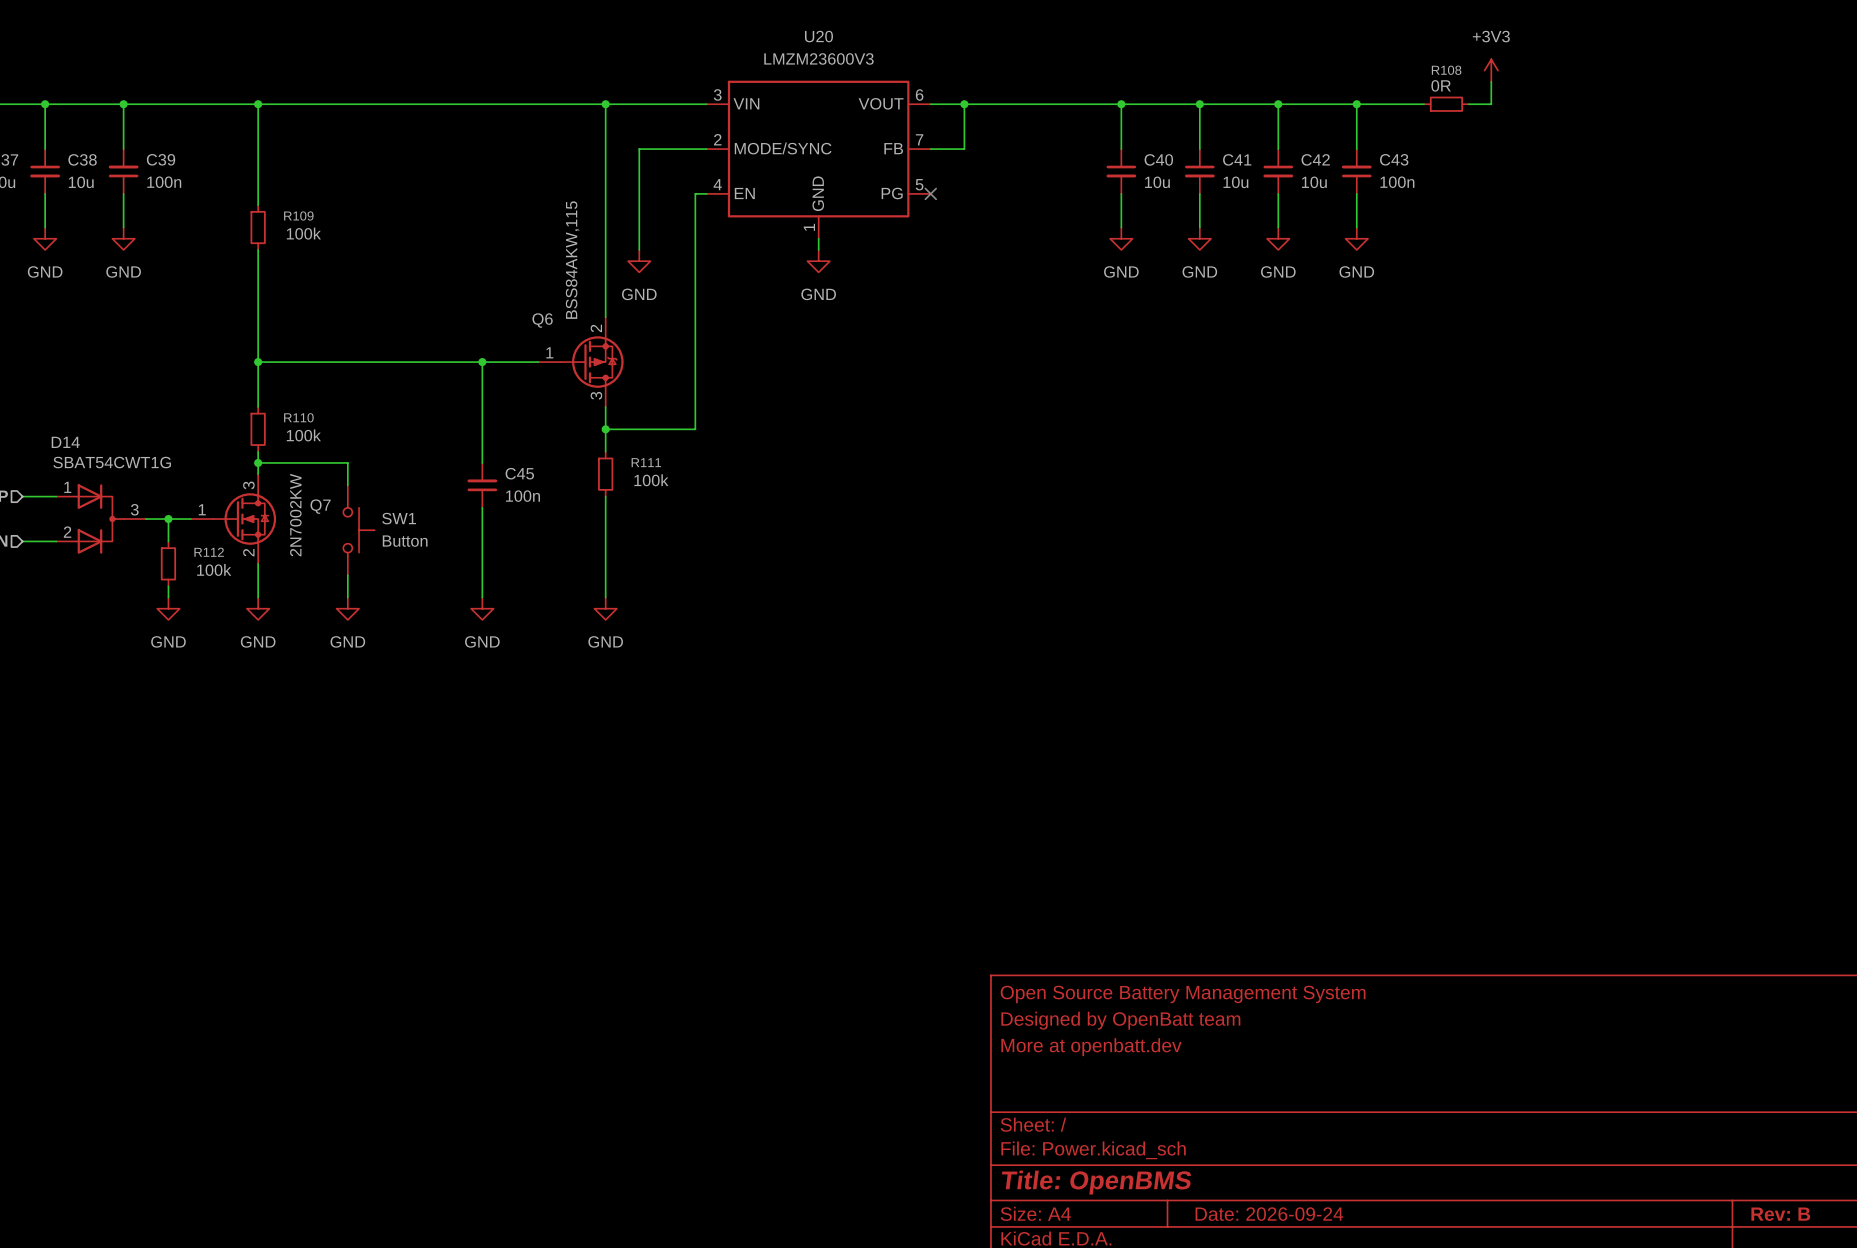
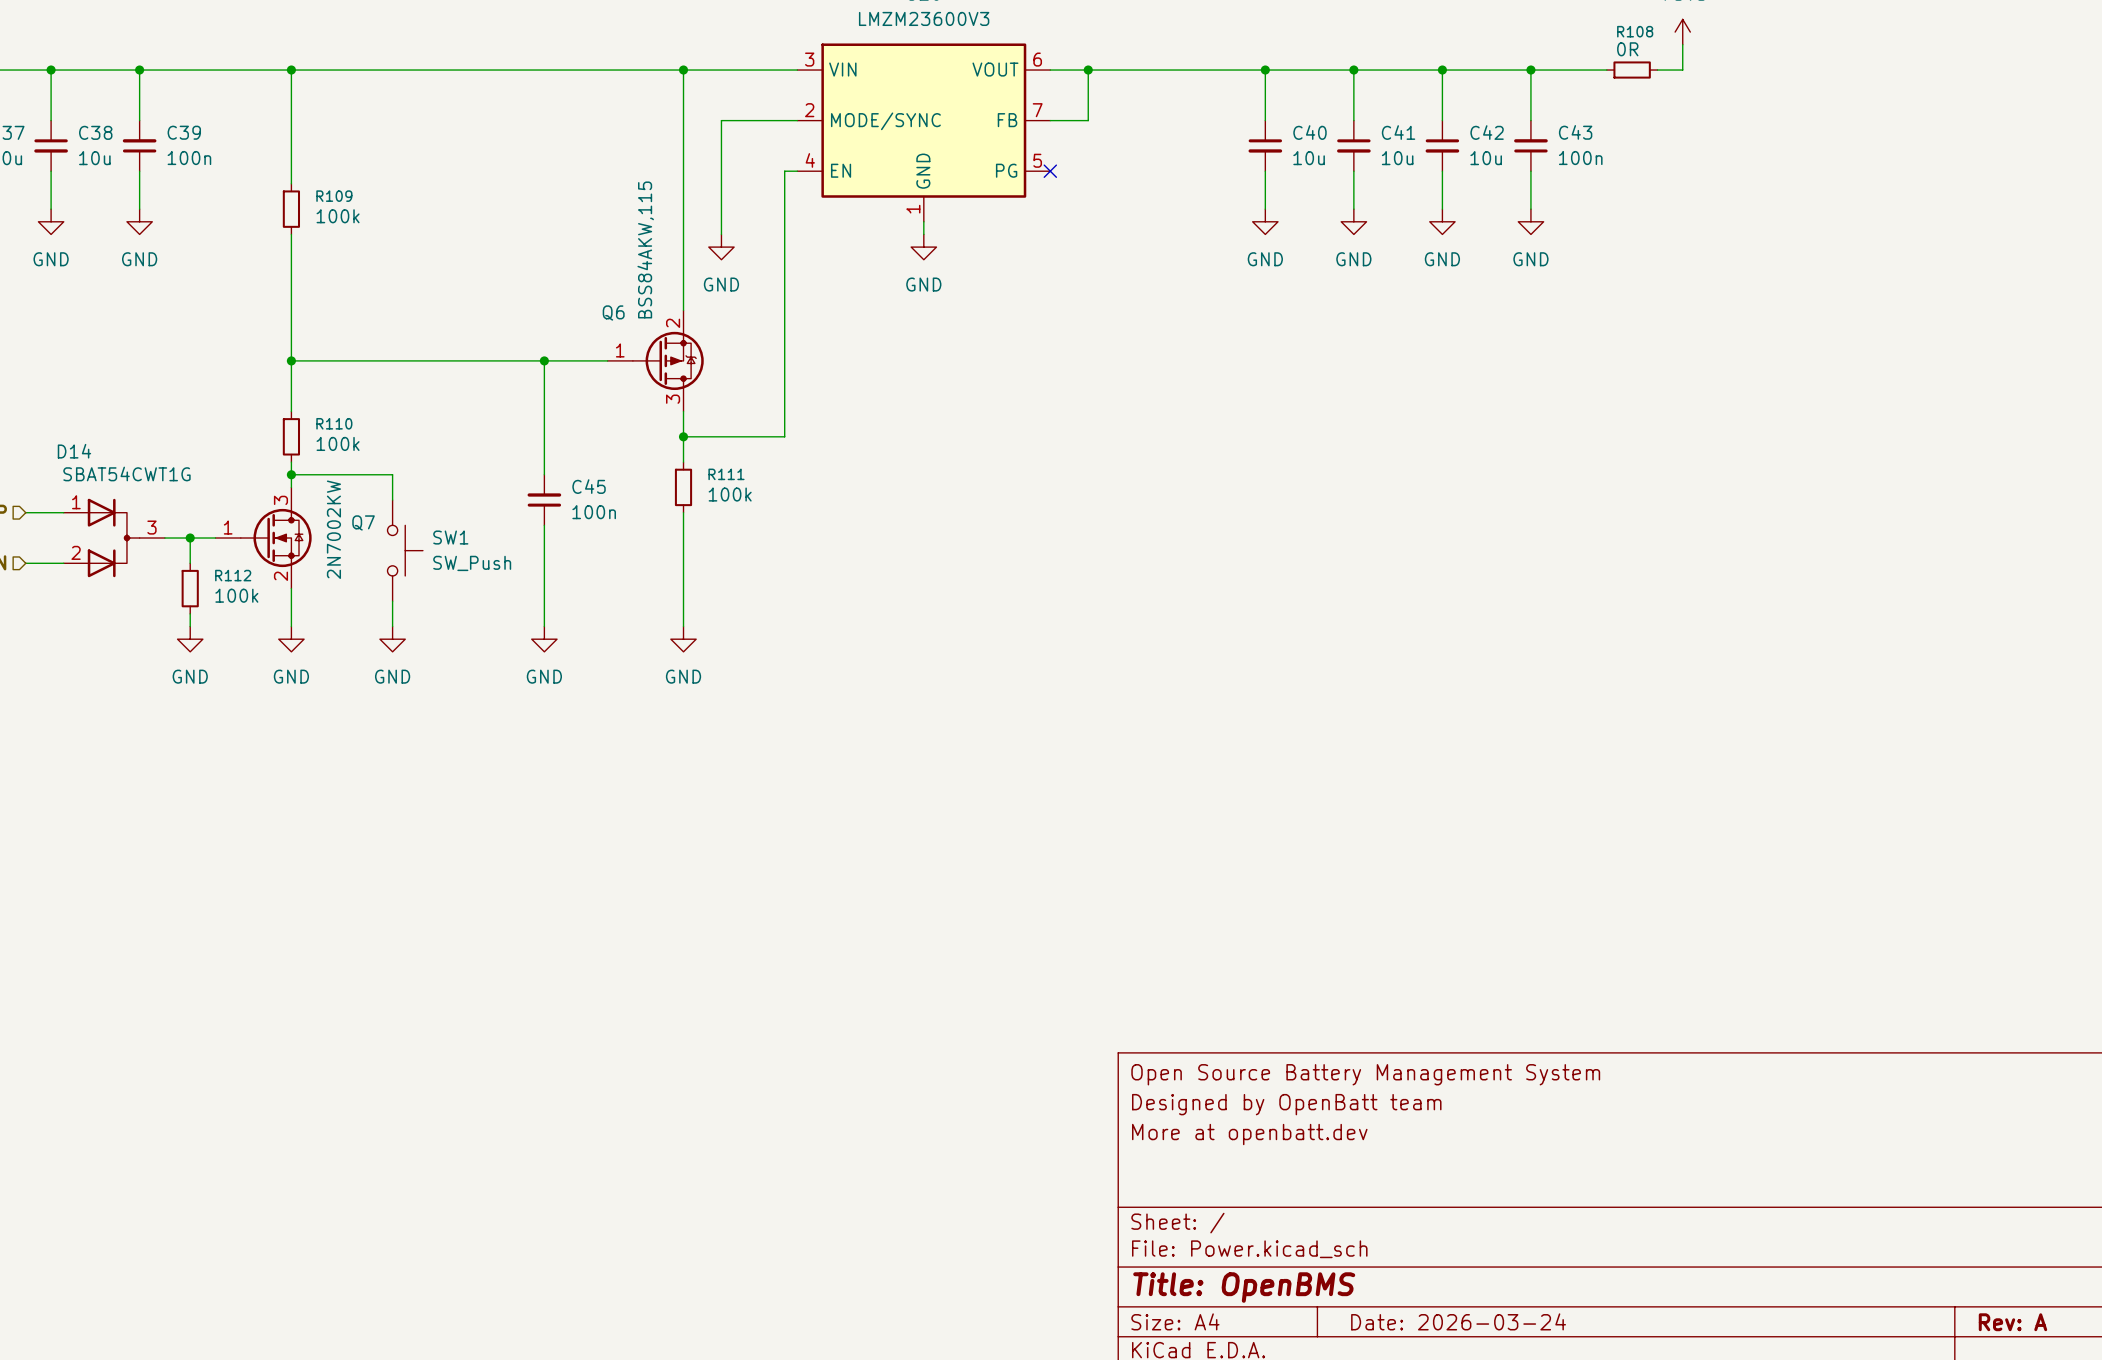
SW1 value: Button (405, 541) -> SW_Push (472, 563)
title block: Date: 2026-09-24 (1269, 1214) -> Date: 2026-03-24 (1458, 1321)
title block: Rev: B (1780, 1214) -> Rev: A (2012, 1322)

